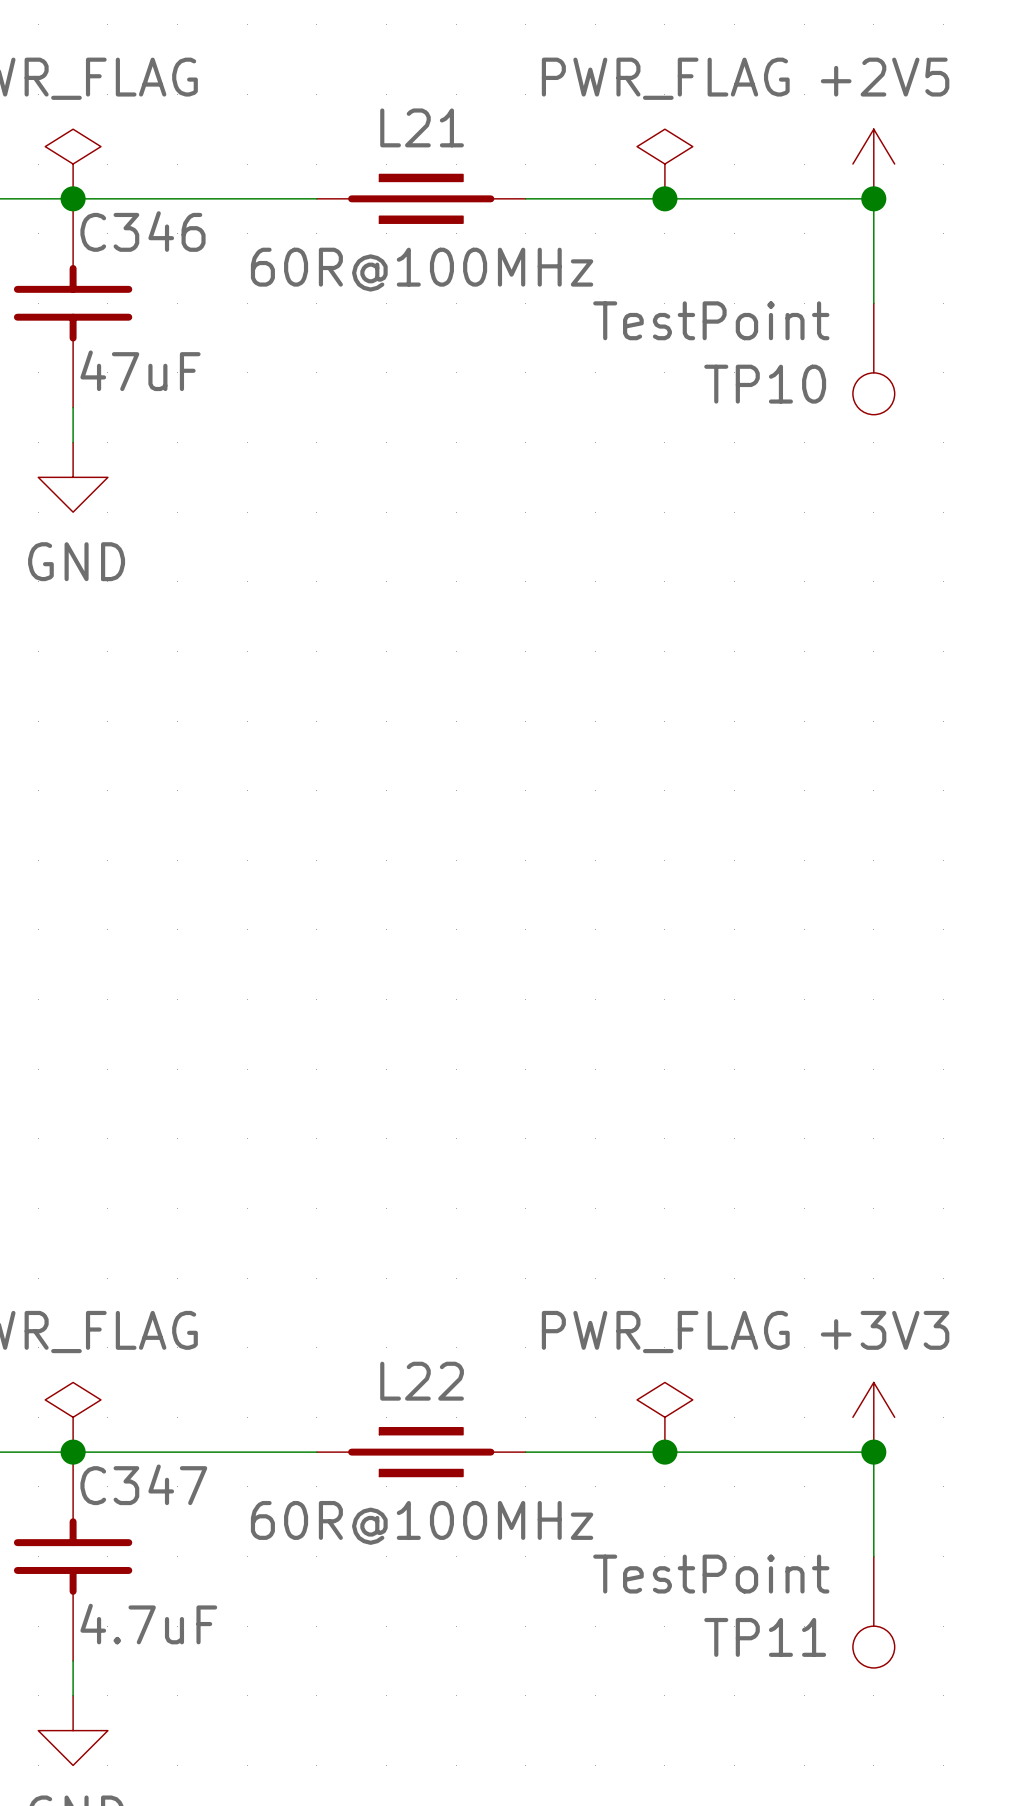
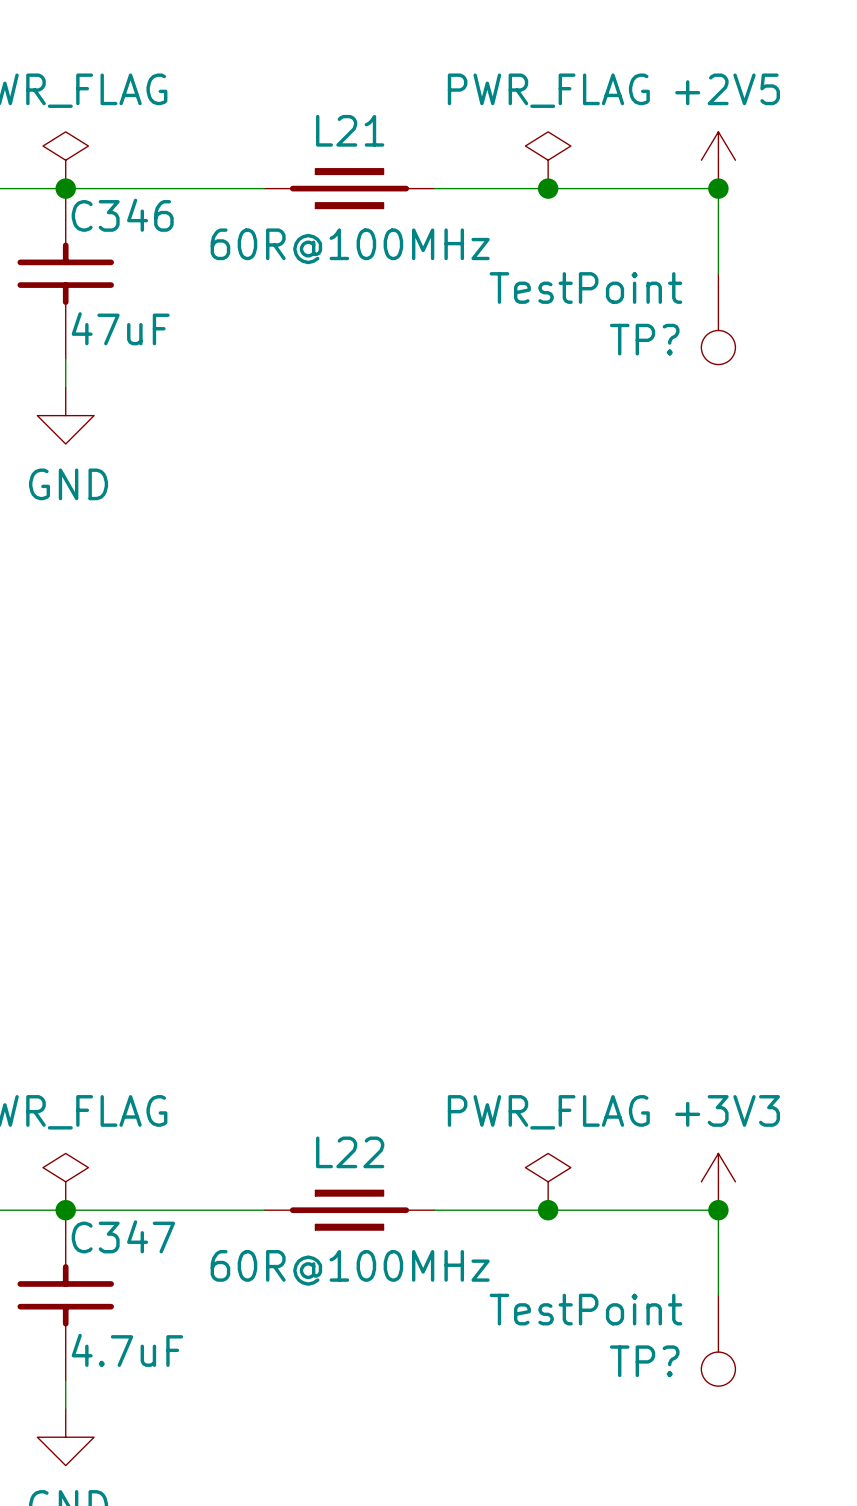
TP10 name: TP10 (765, 384) -> TP? (644, 339)
TP11 name: TP11 (765, 1637) -> TP? (644, 1361)

